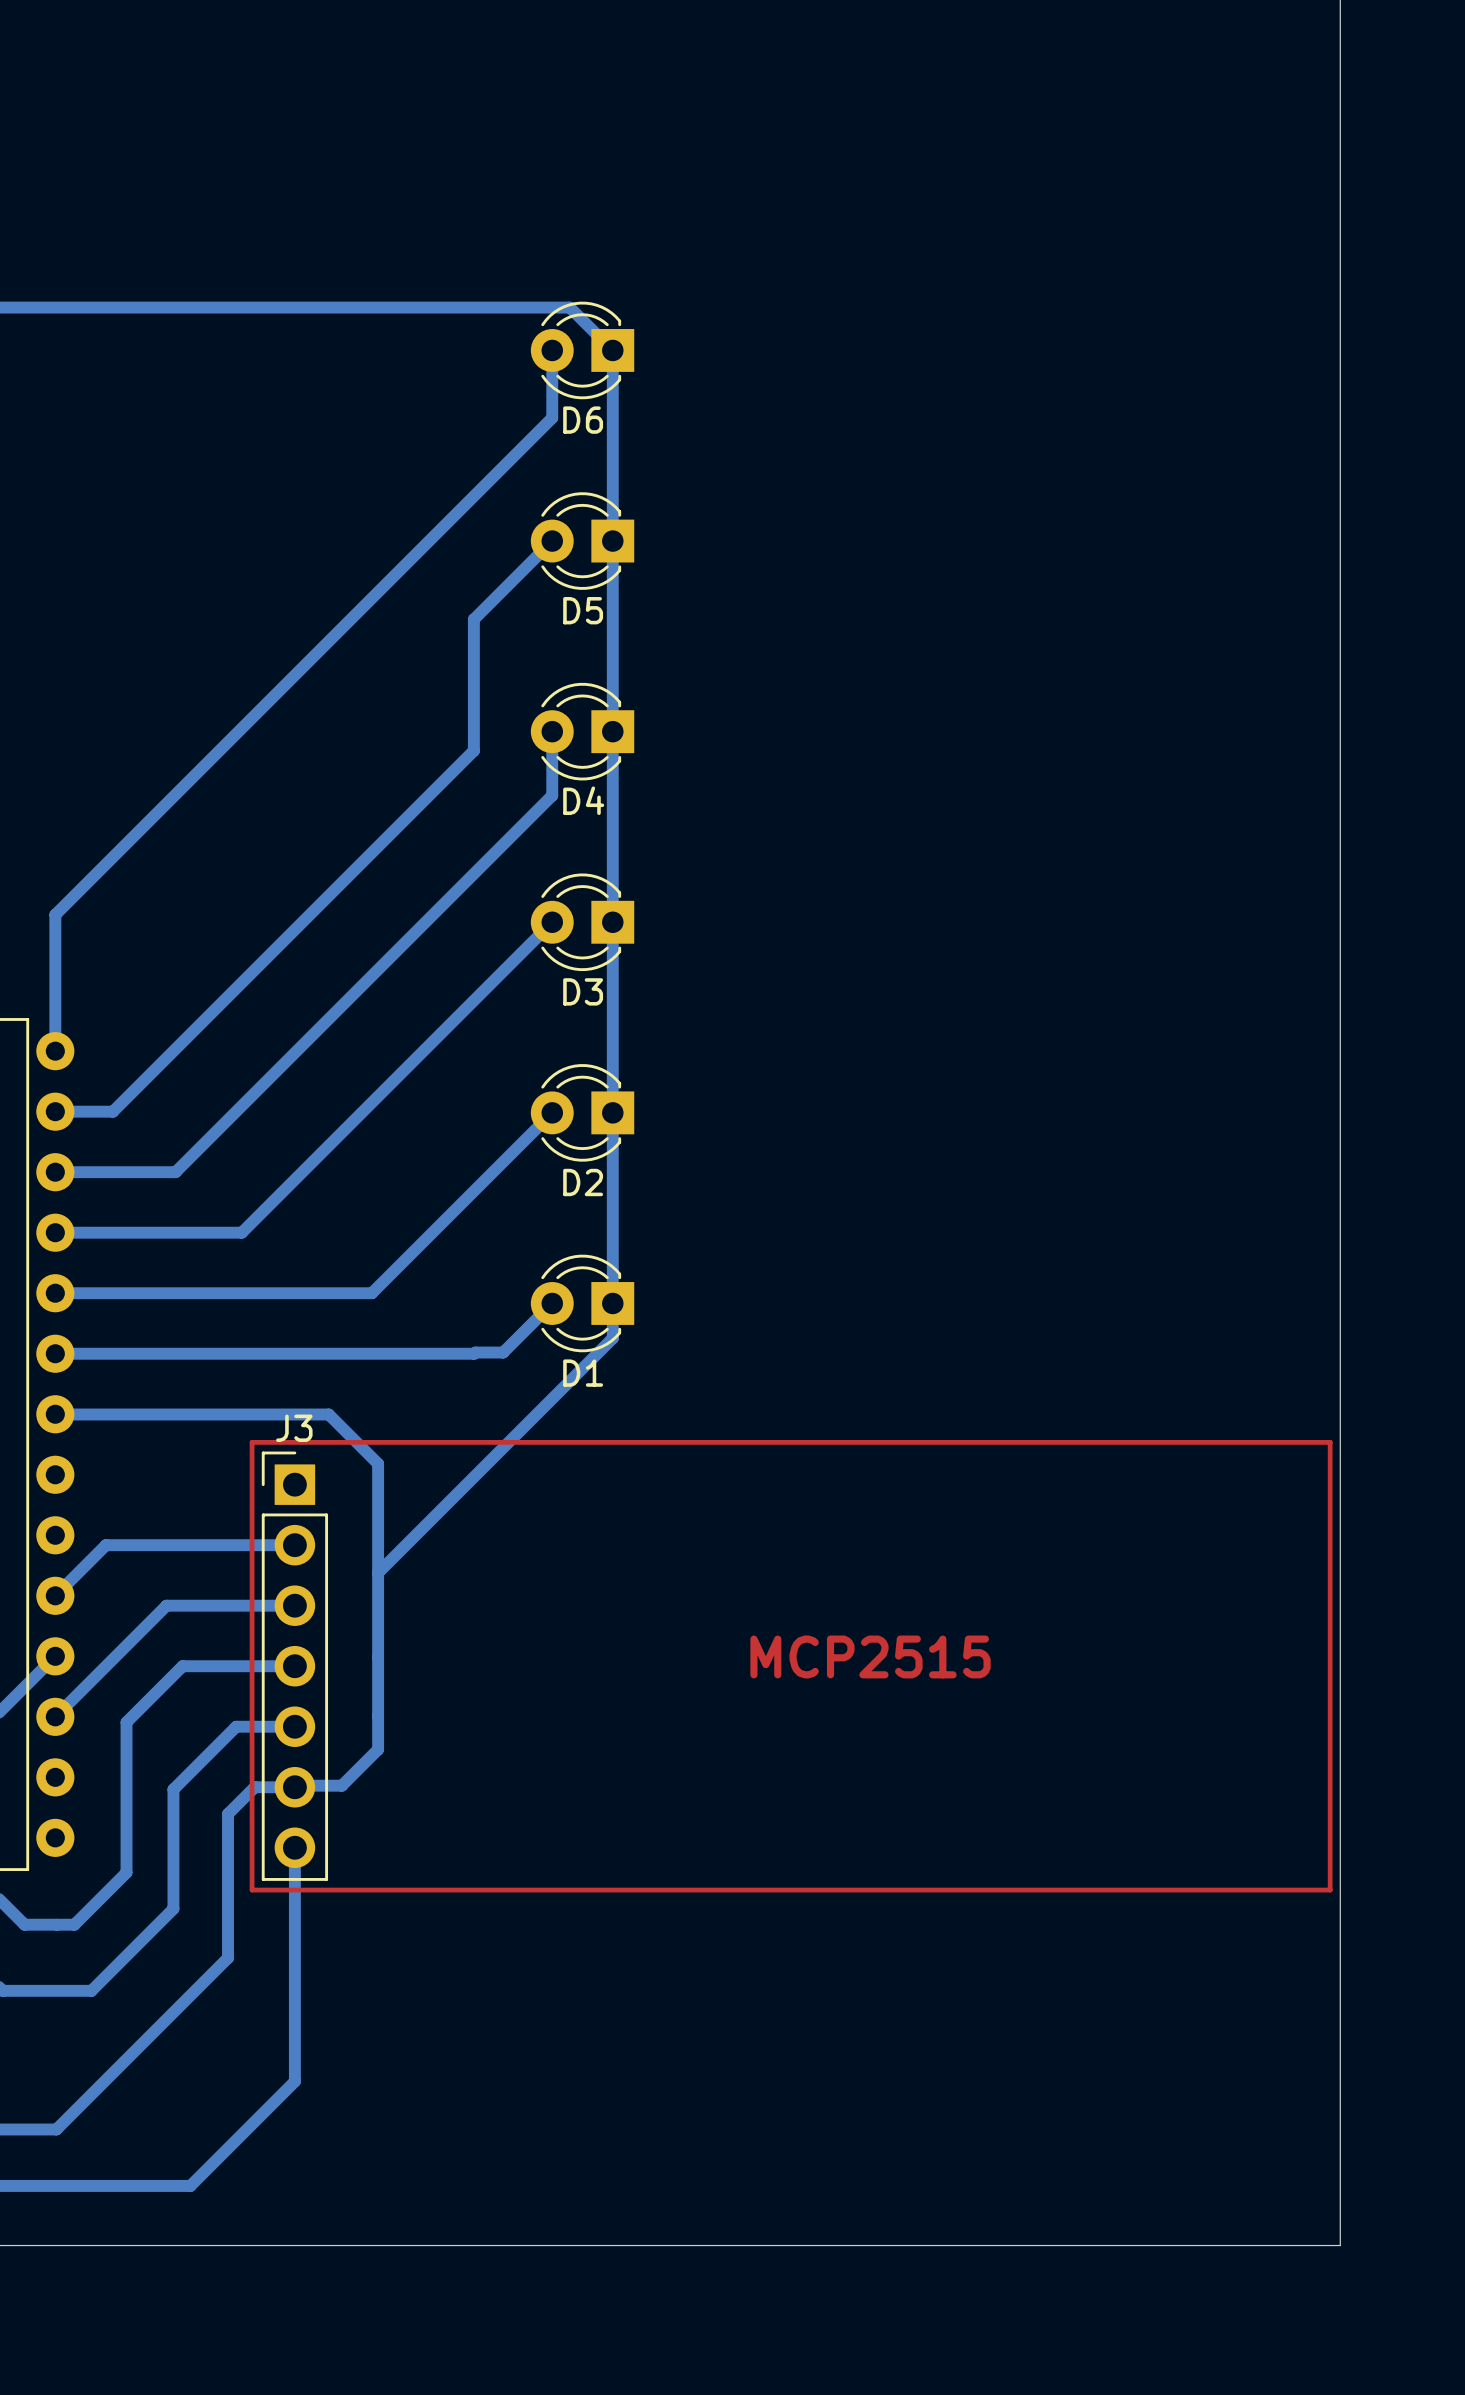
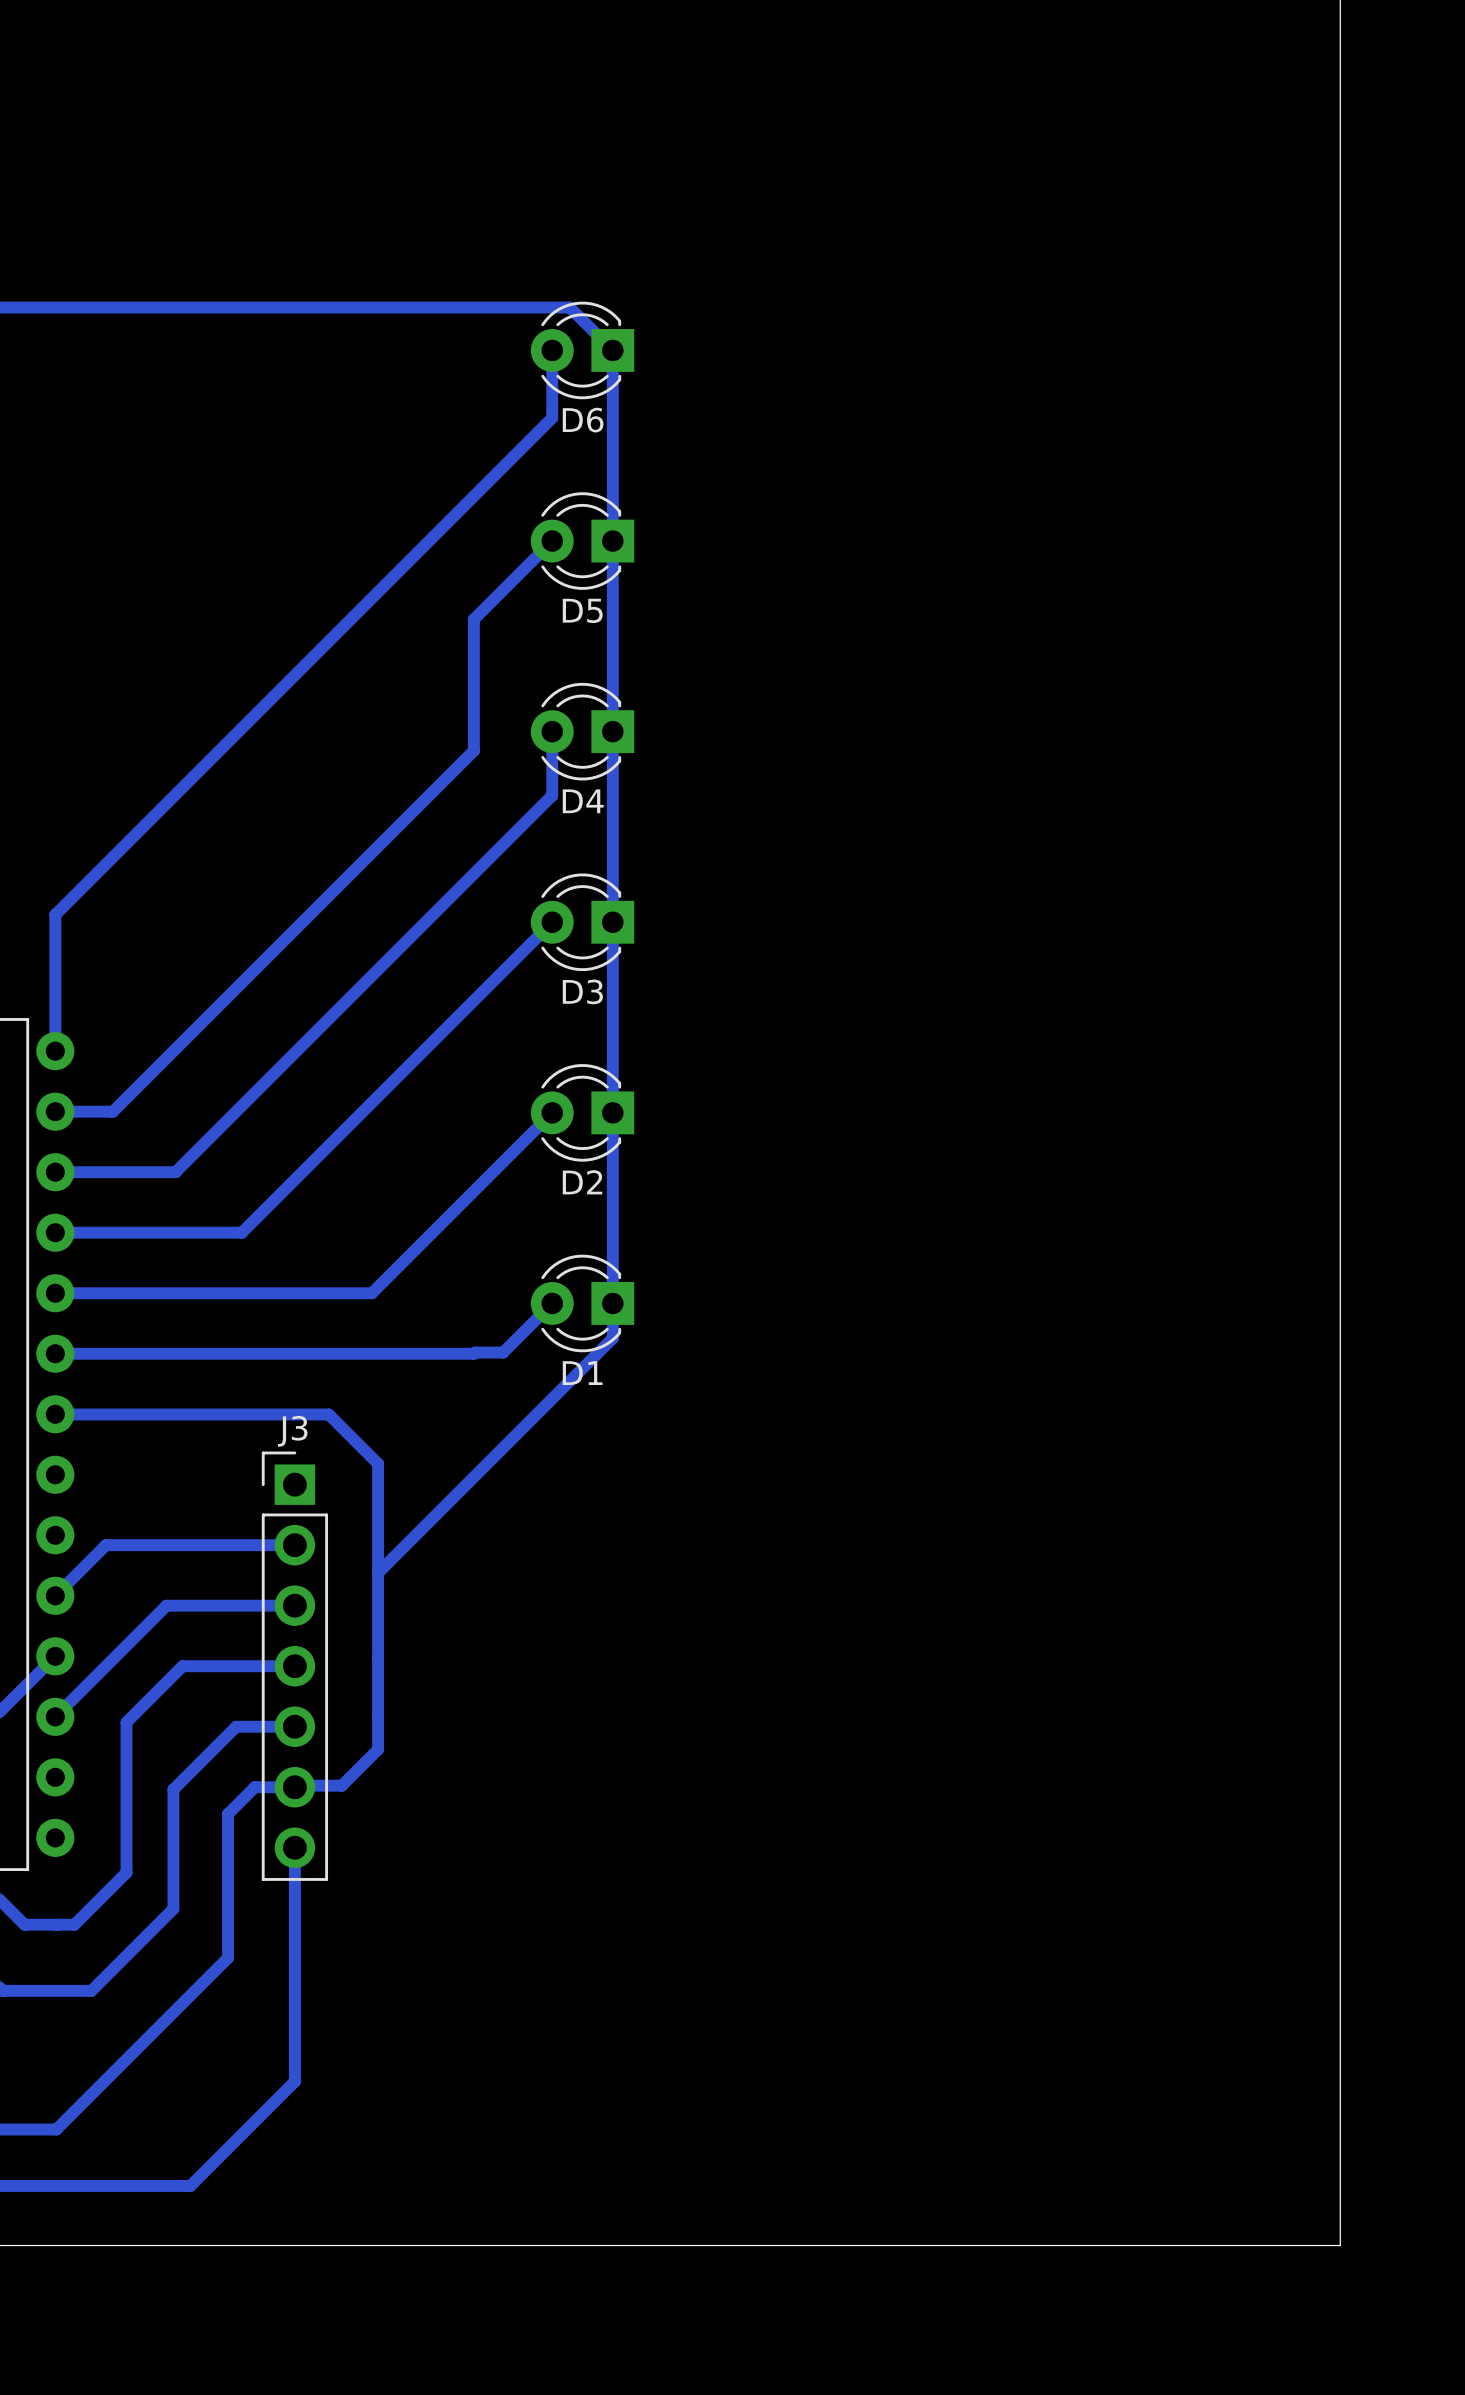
top track: (252, 1442) (1330, 1442) (1330, 1890) (252, 1890) (252, 1442) -> none
text: MCP2515 (870, 1656) -> none

